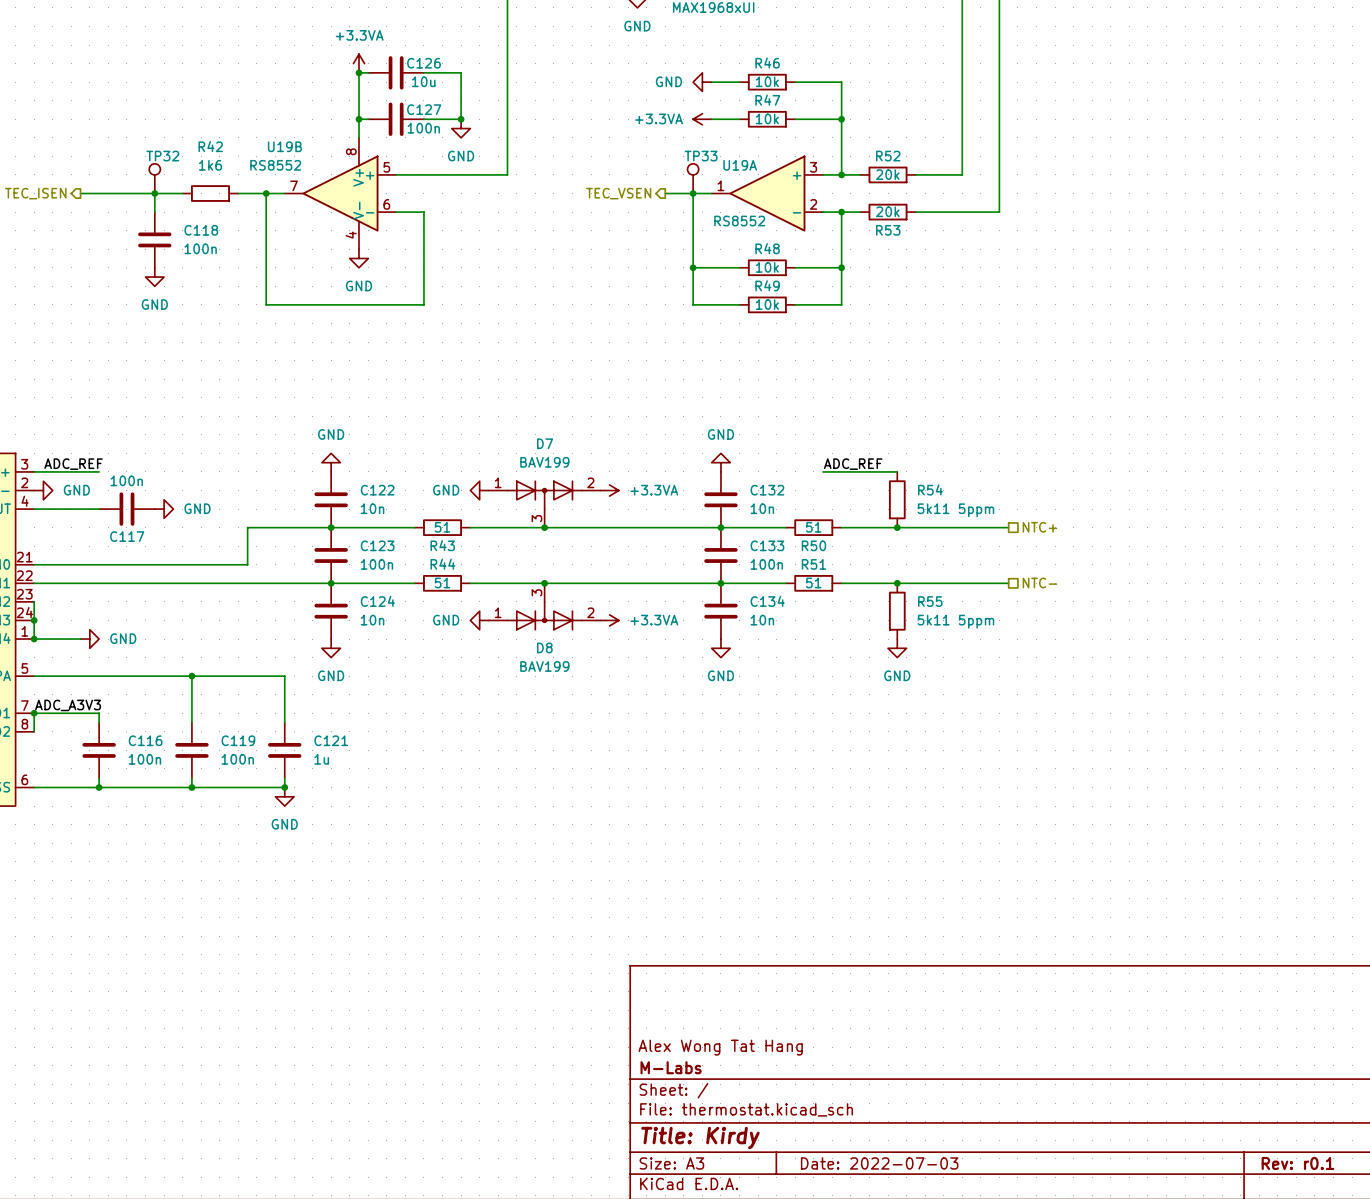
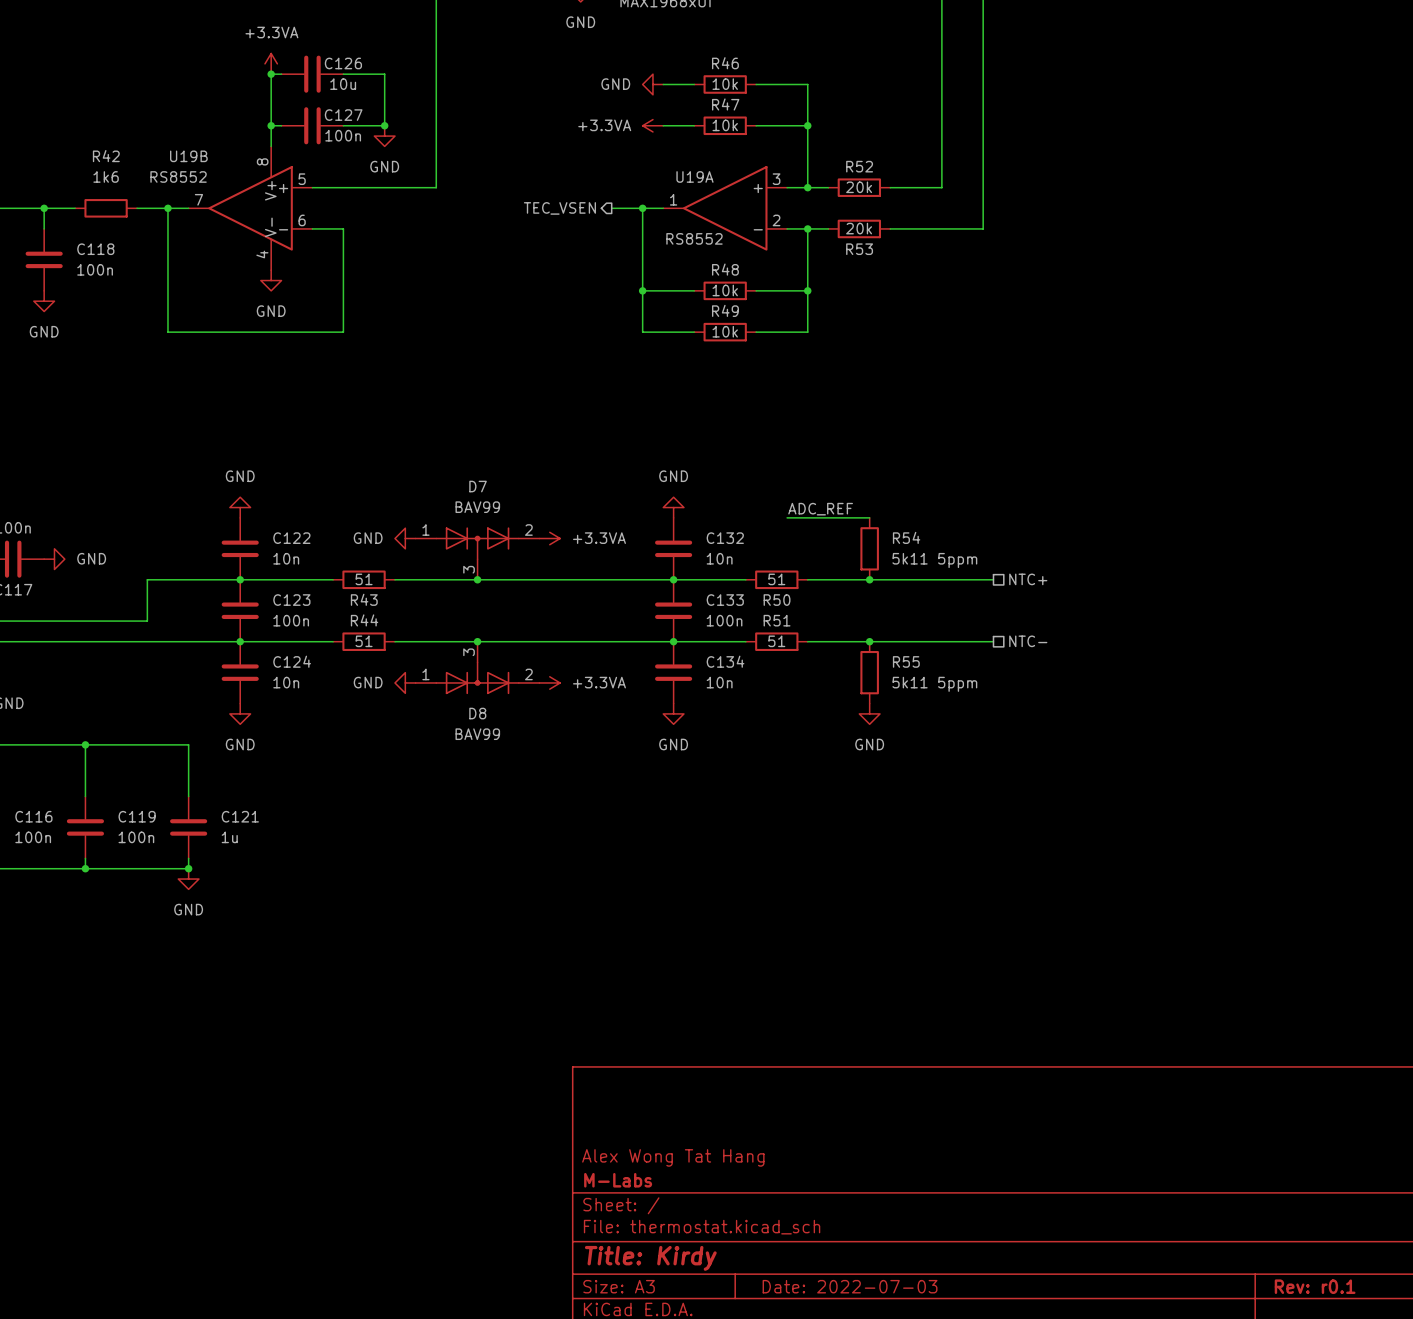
TP32: (154, 178) -> none
TP33: (693, 178) -> none
D7 value: BAV199 (544, 462) -> BAV99 (477, 507)
D8 value: BAV199 (544, 666) -> BAV99 (477, 734)

